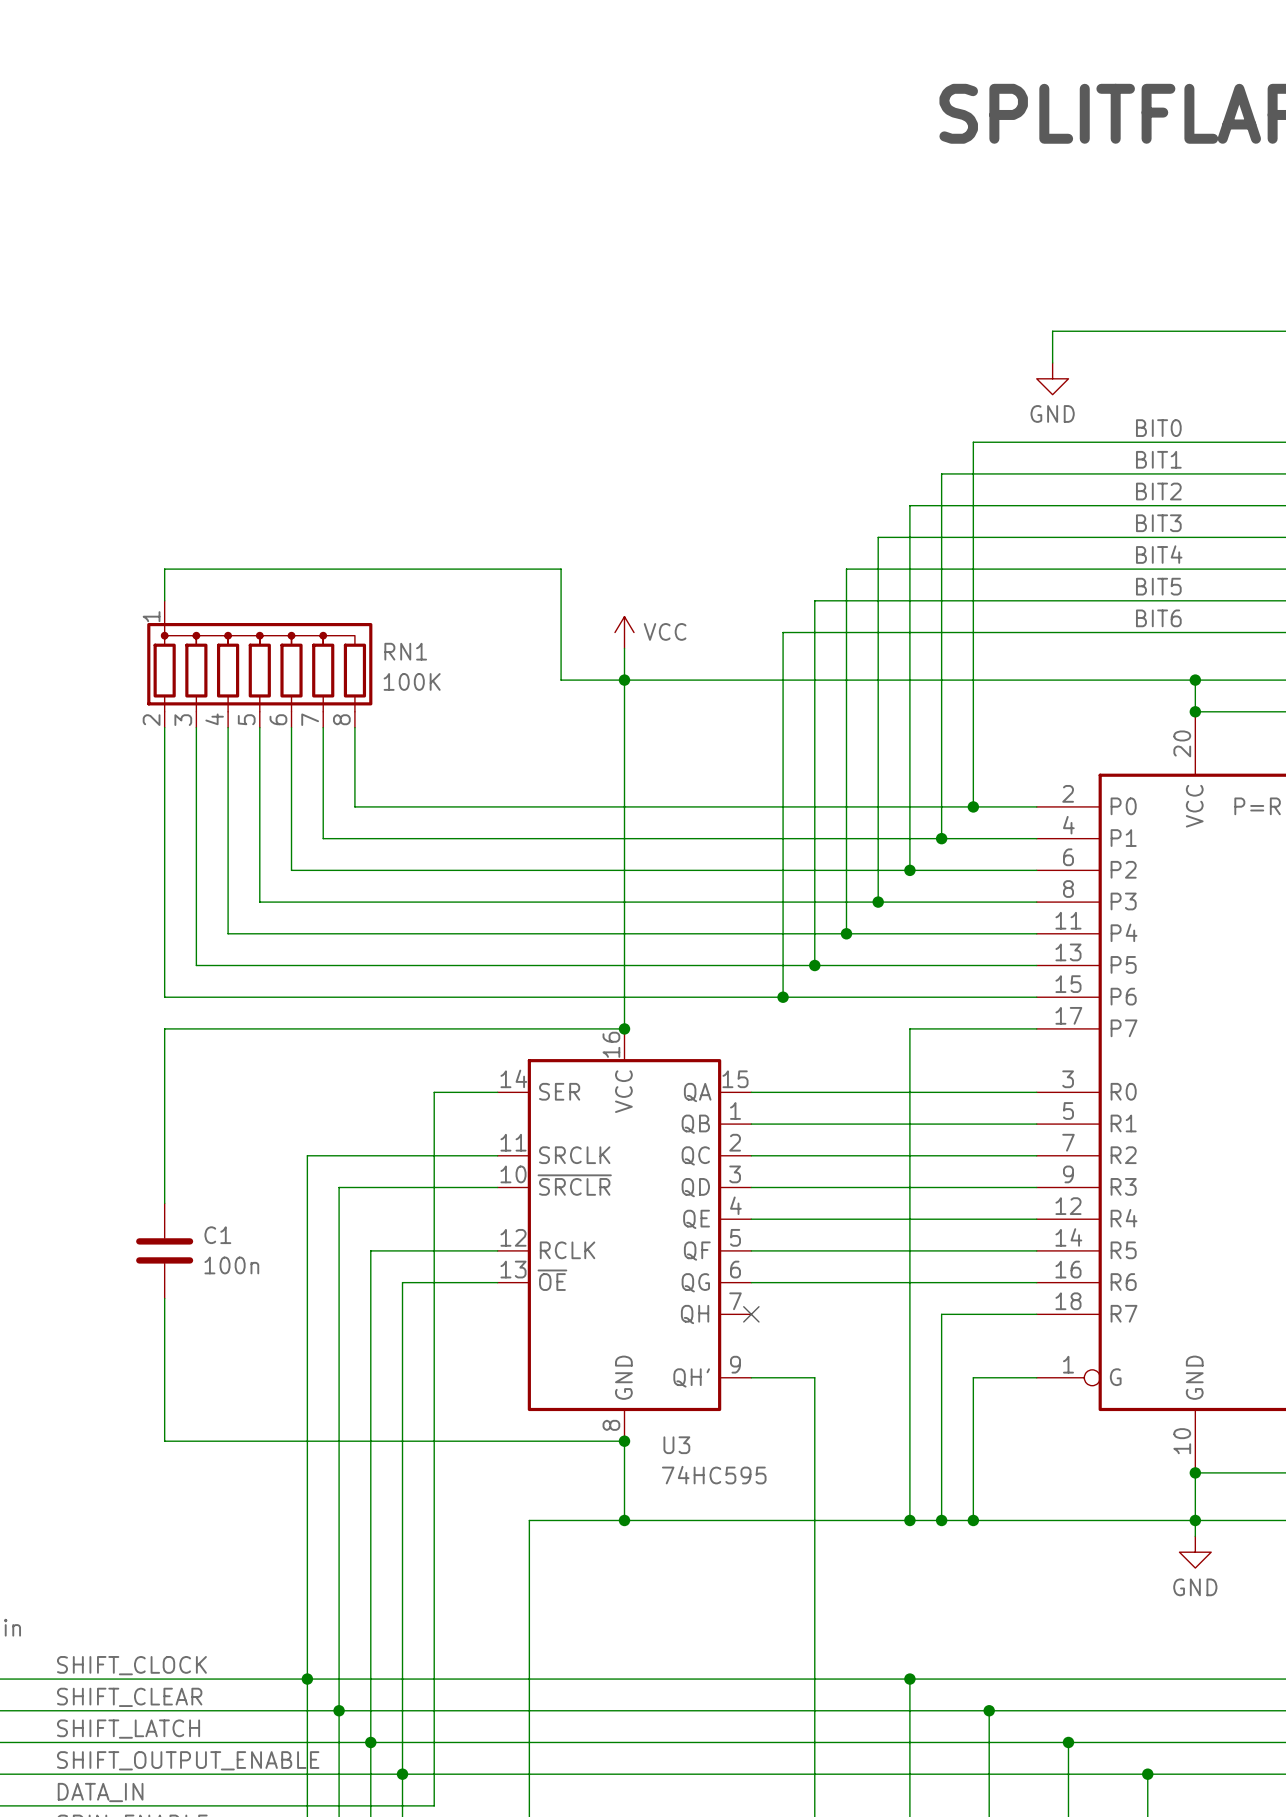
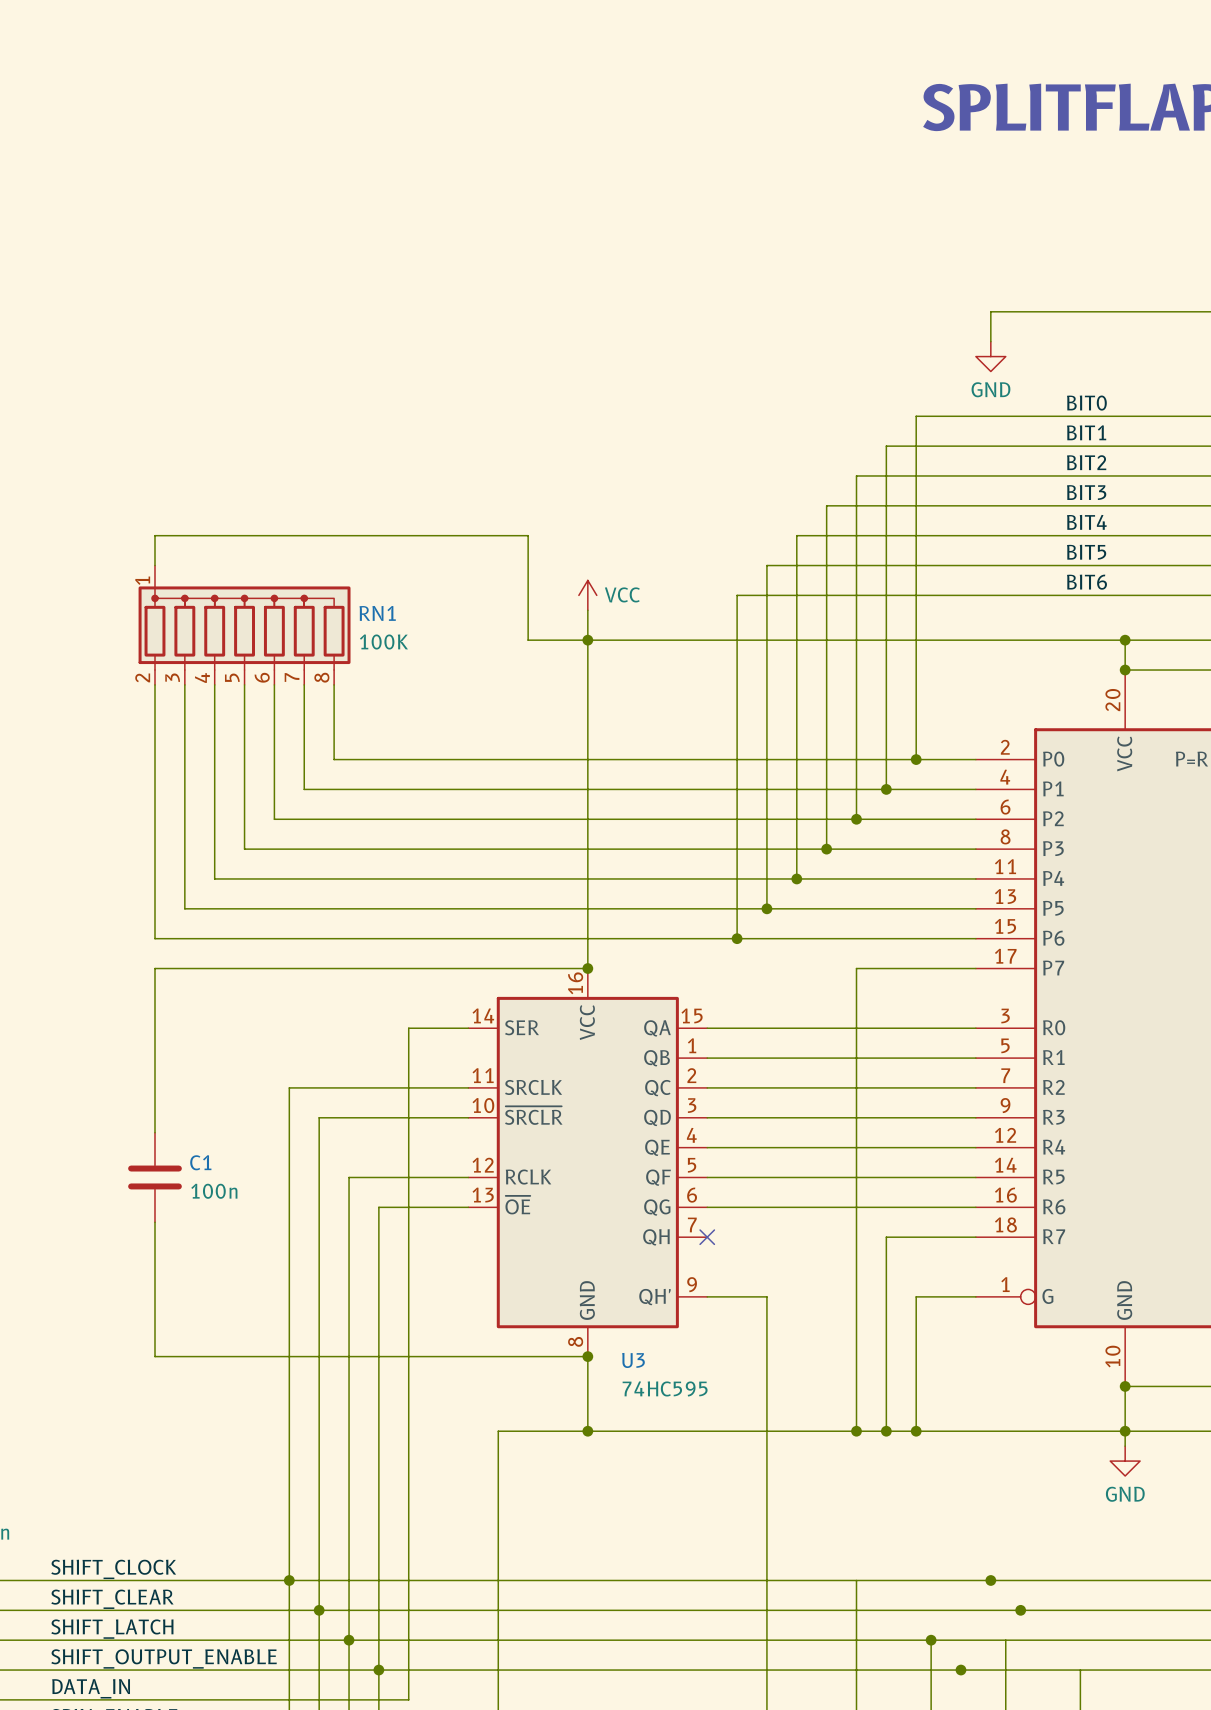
junction: (909, 1679) -> none
junction: none -> (990, 1580)
wire: (989, 1710) (989, 1742) -> none
junction position: (989, 1710) -> (931, 1640)
junction: none -> (1020, 1610)
junction: (1068, 1742) -> none
junction: none -> (960, 1670)
junction: (1147, 1774) -> none

